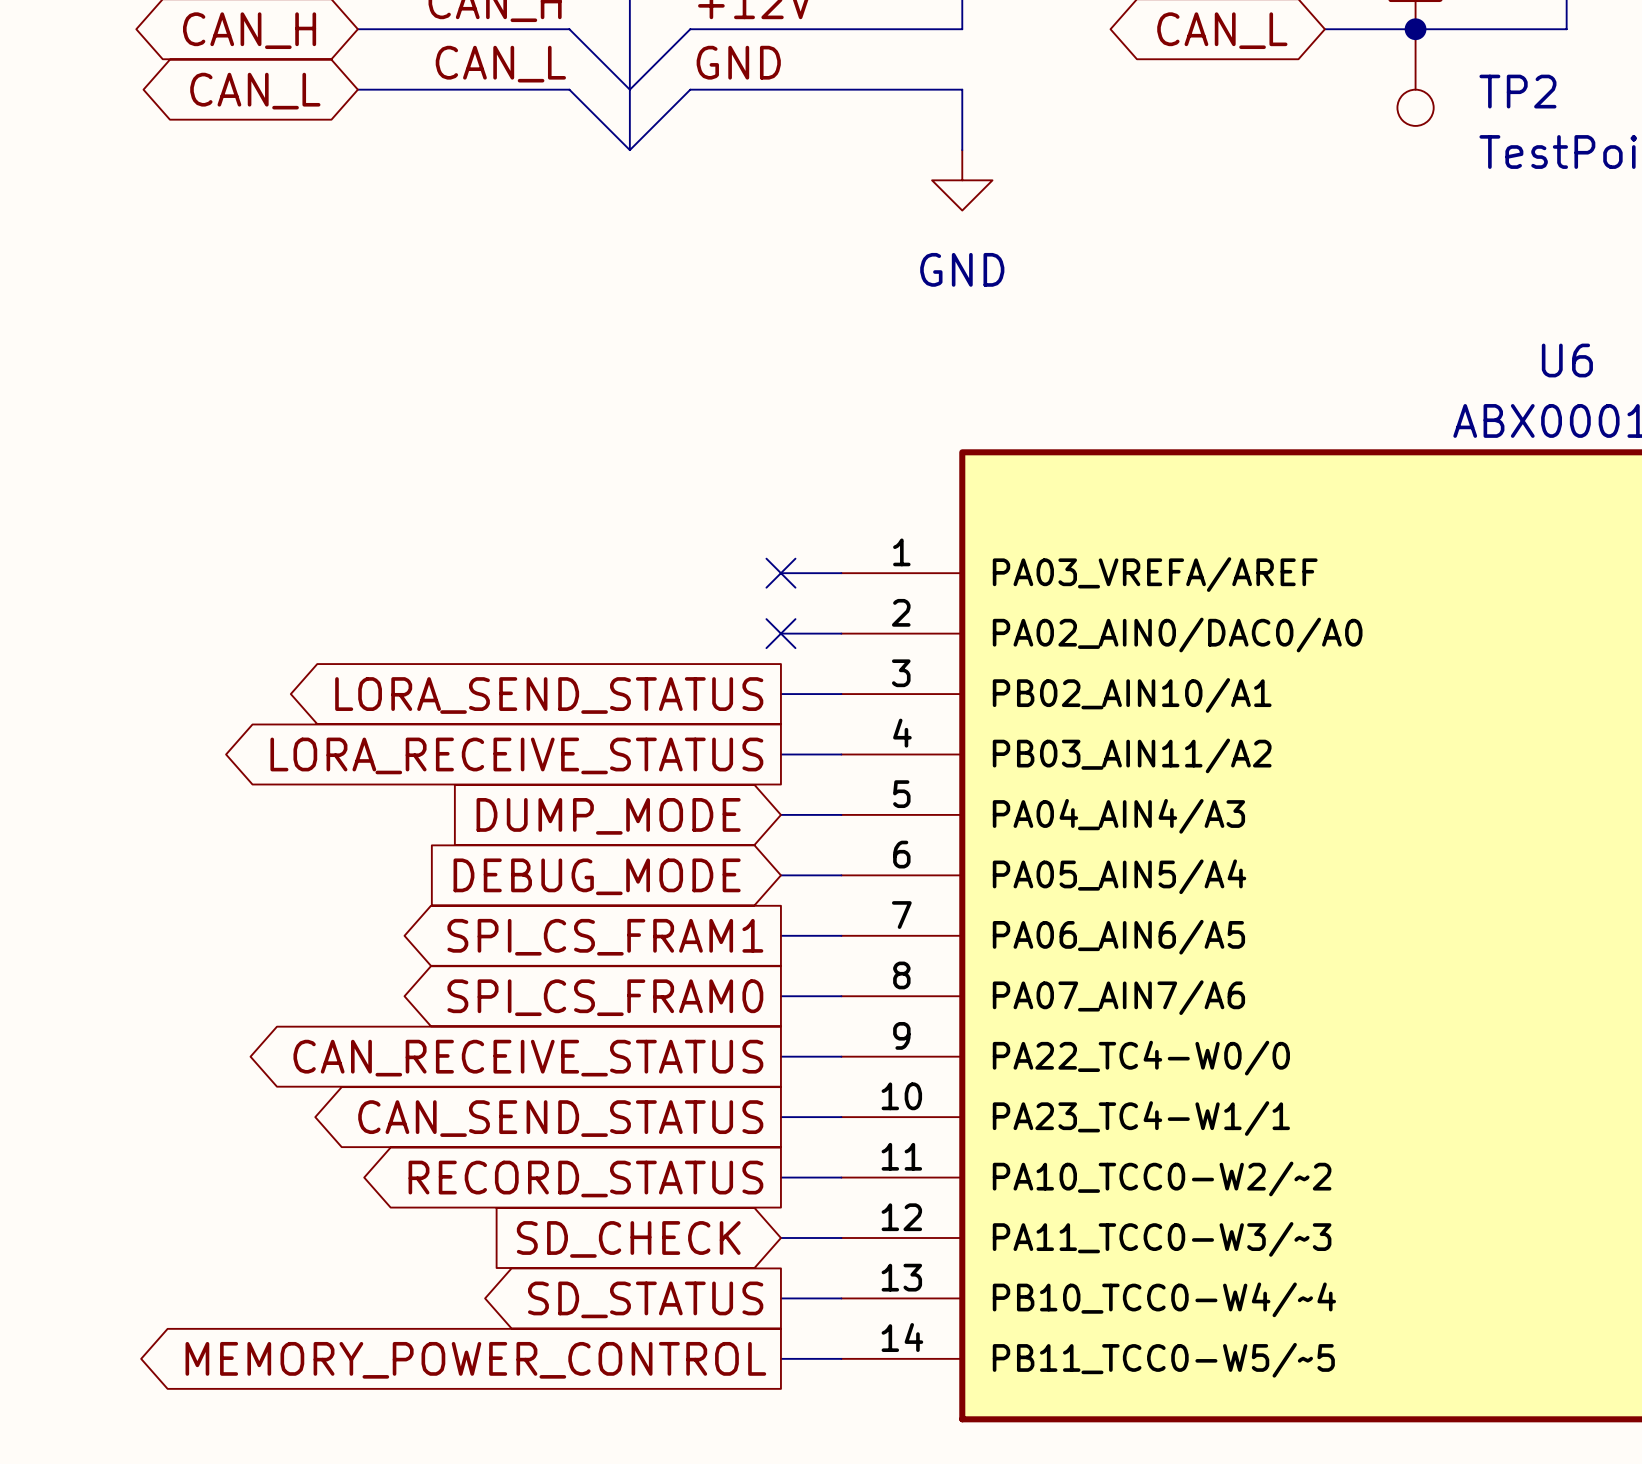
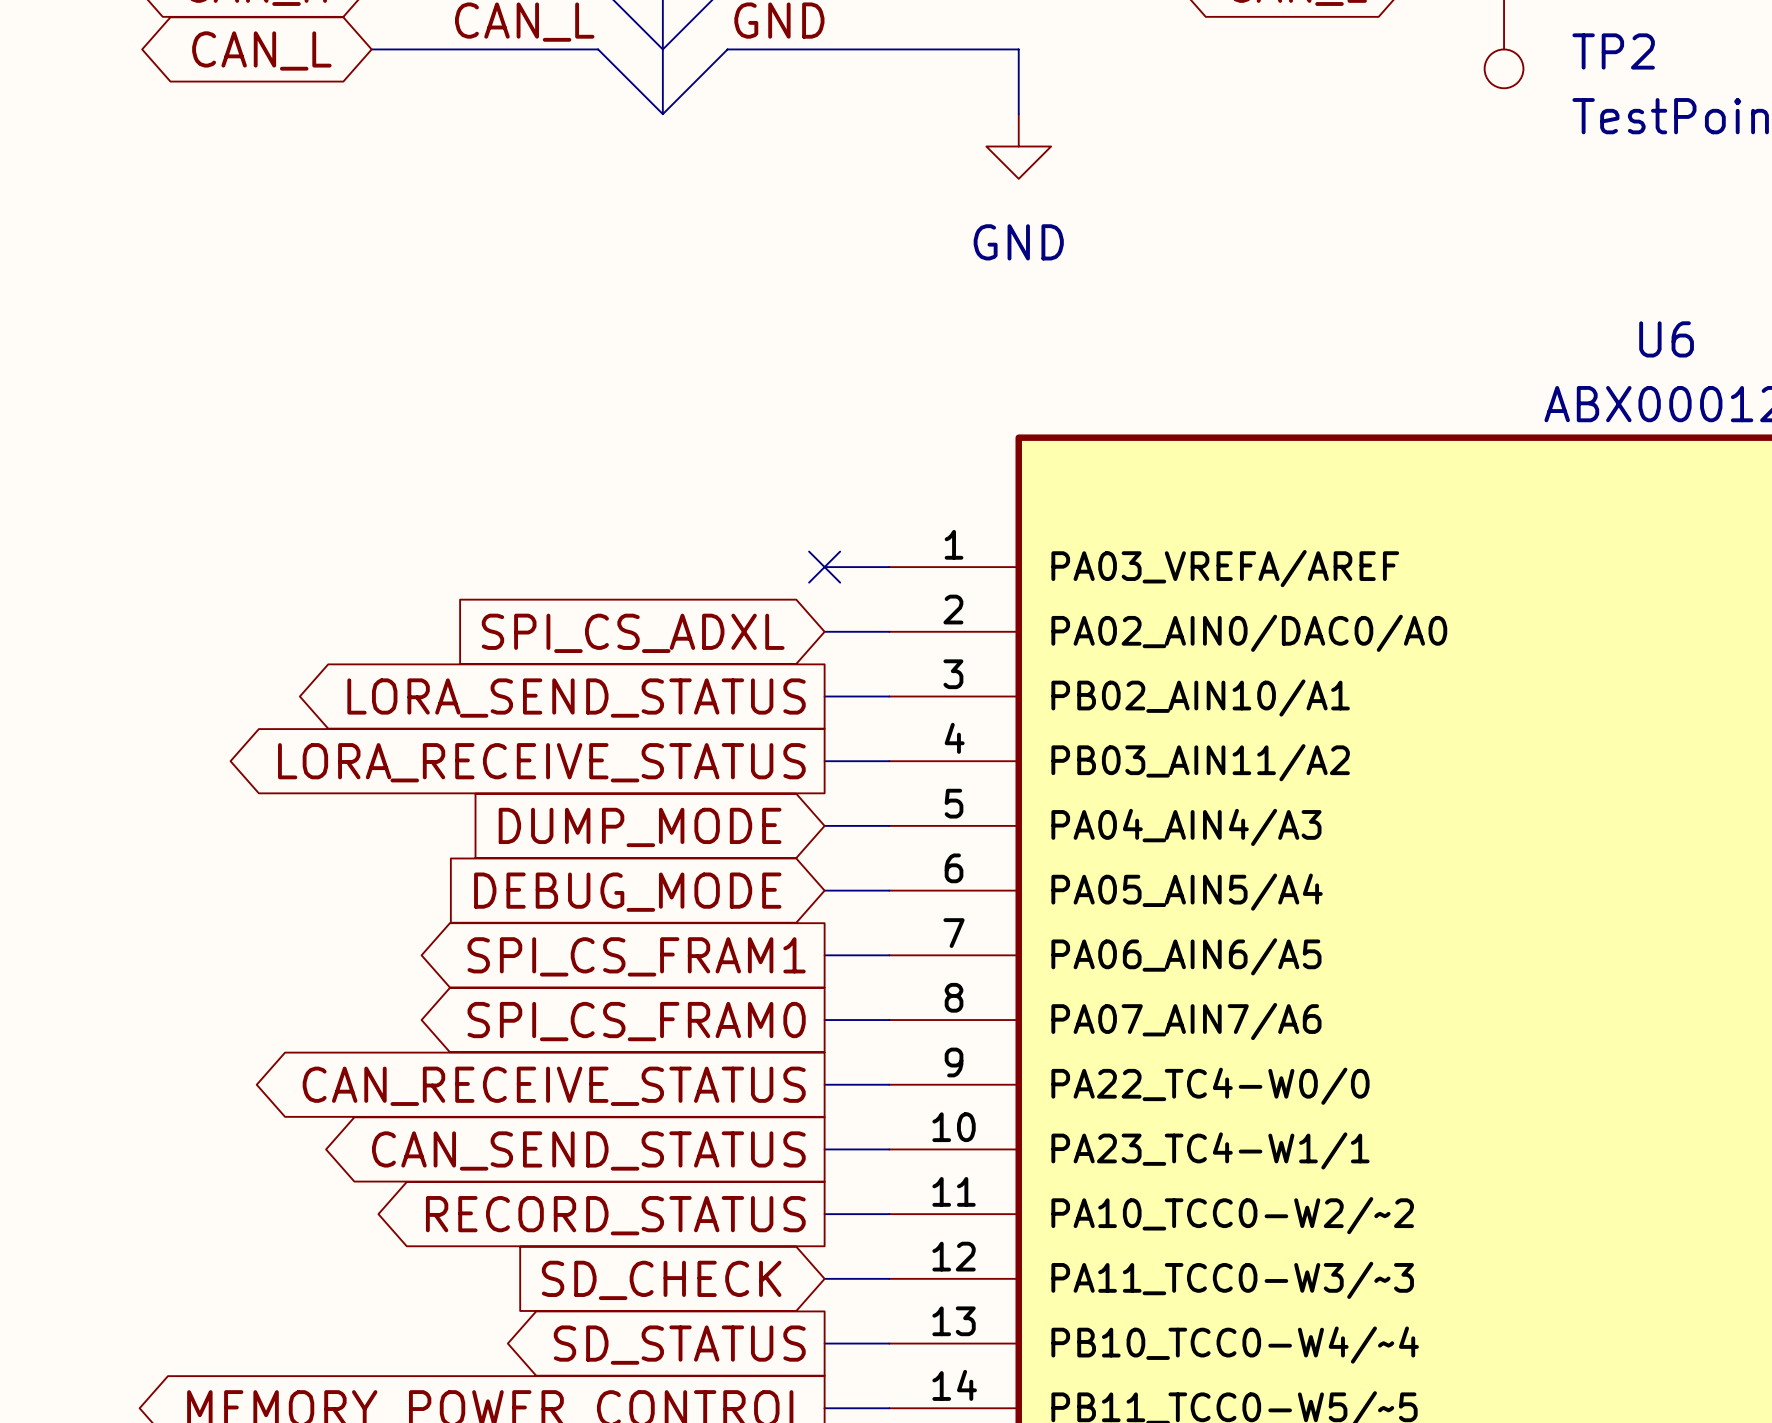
no-connect mark: (780, 633) -> none
global label: none -> SPI_CS_ADXL (633, 633)

